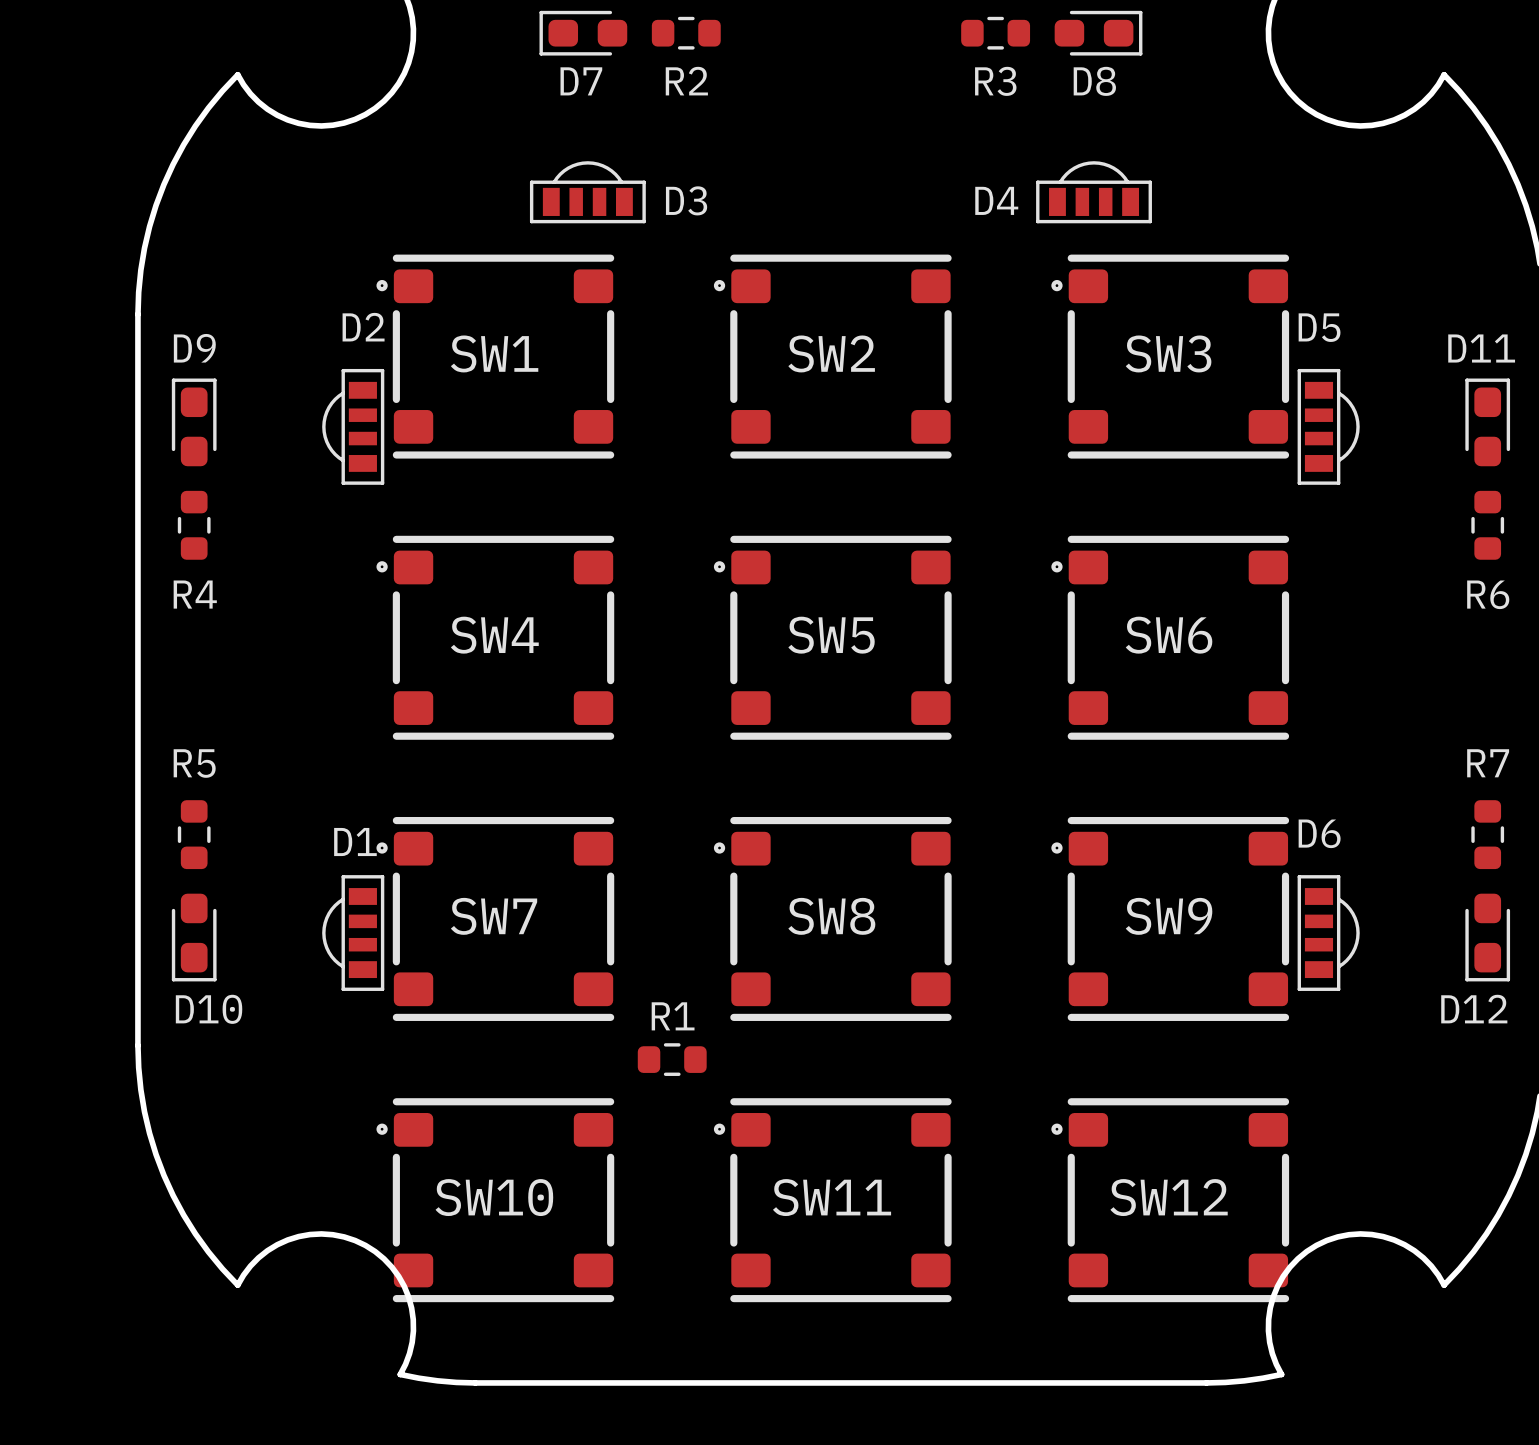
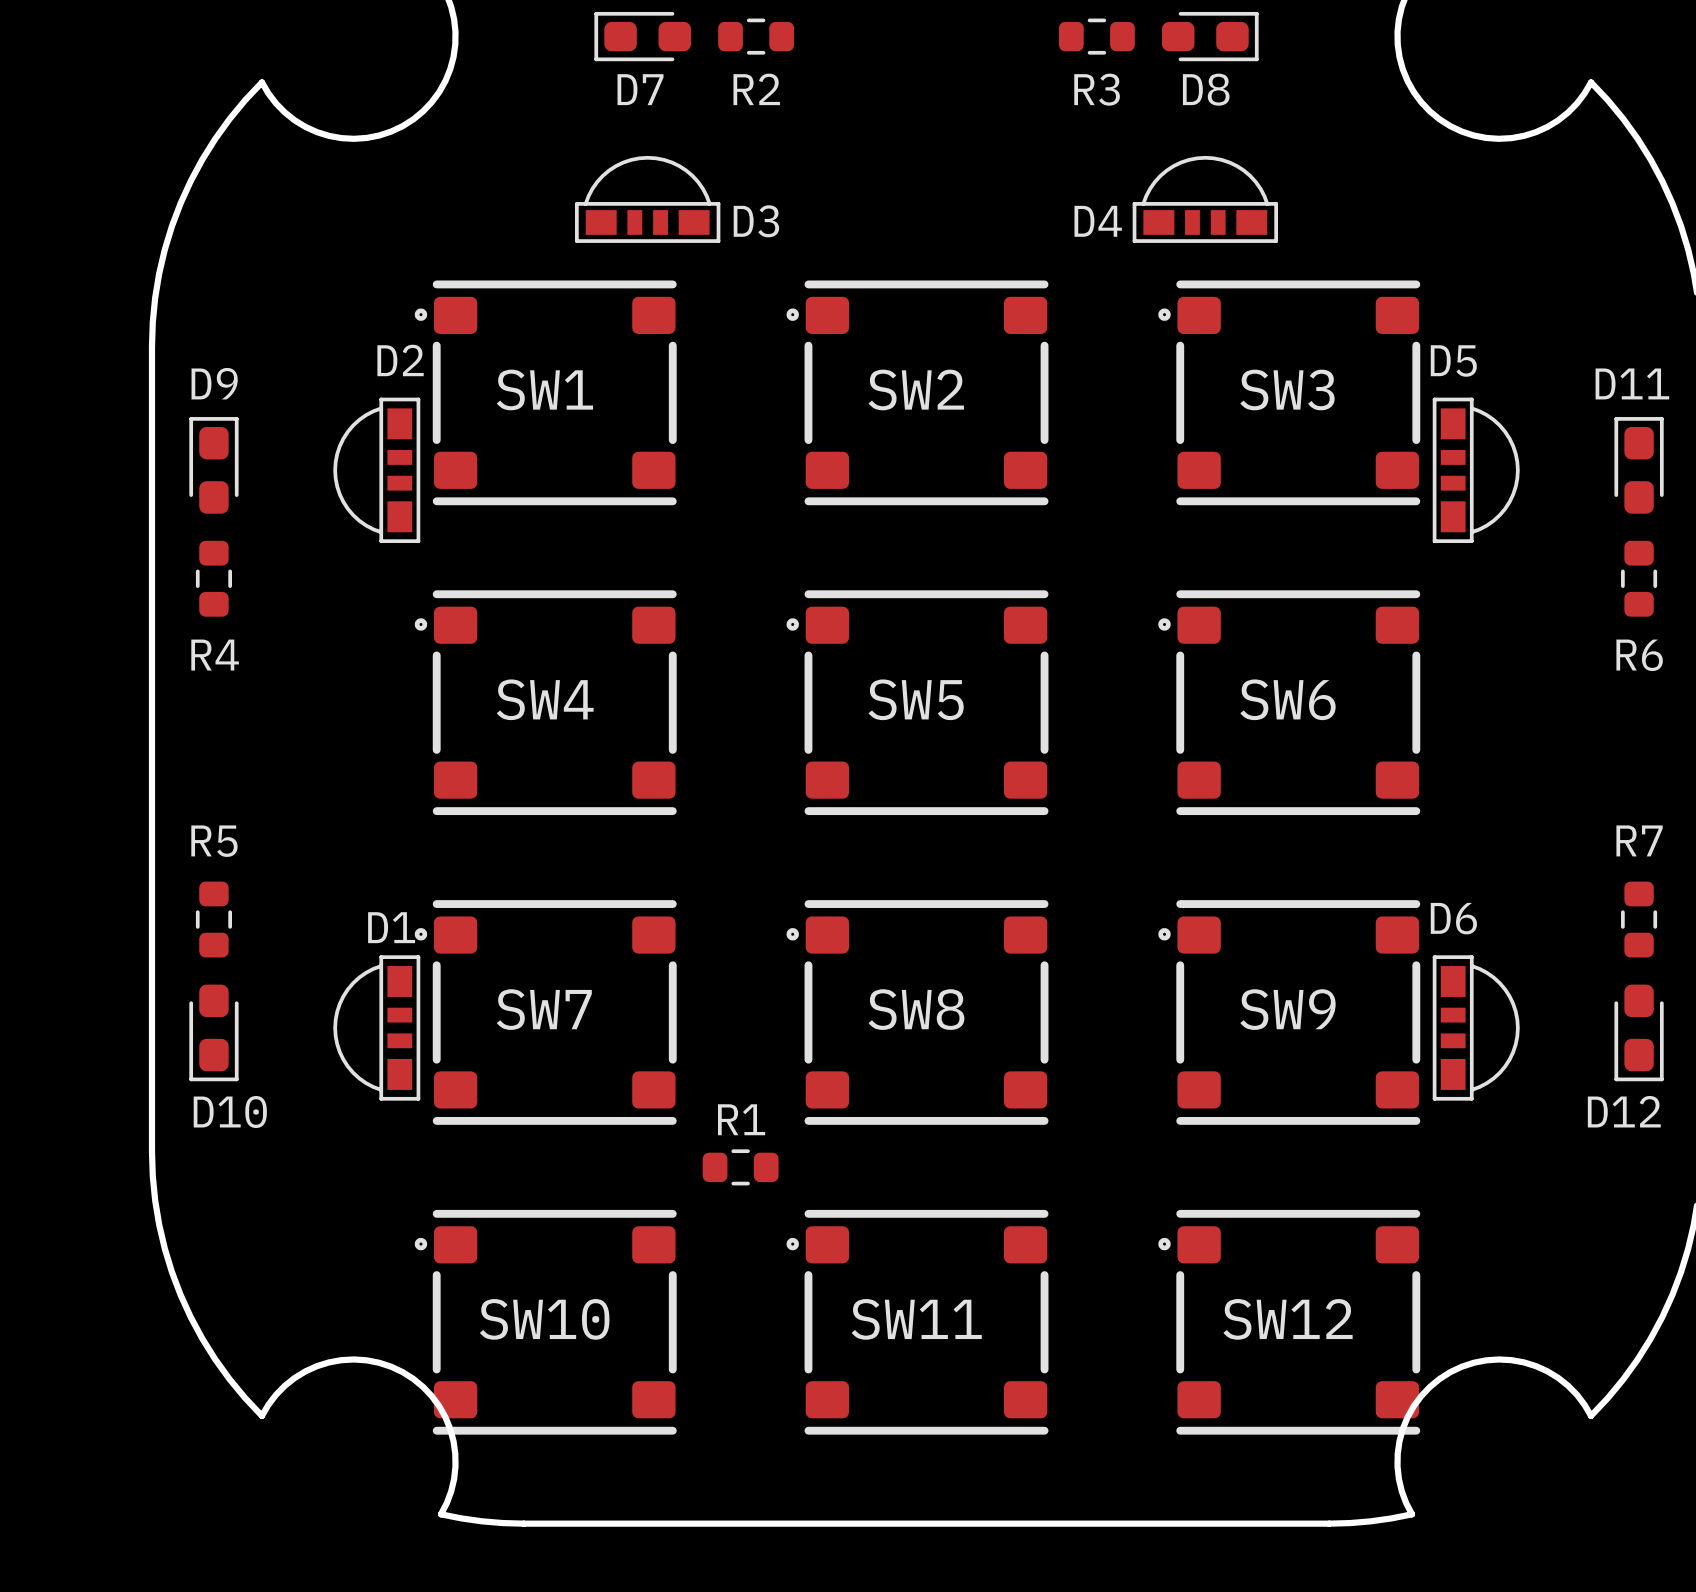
D3 footprint: [529, 161, 646, 224] -> [575, 155, 721, 243]
D4 footprint: [1036, 161, 1152, 224] -> [1132, 155, 1279, 243]
D2 footprint: [322, 368, 385, 485] -> [333, 397, 421, 543]
D5 footprint: [1297, 368, 1360, 485] -> [1432, 397, 1520, 543]
D1 footprint: [322, 875, 385, 991] -> [333, 955, 421, 1101]
D6 footprint: [1297, 875, 1360, 991] -> [1432, 955, 1520, 1101]

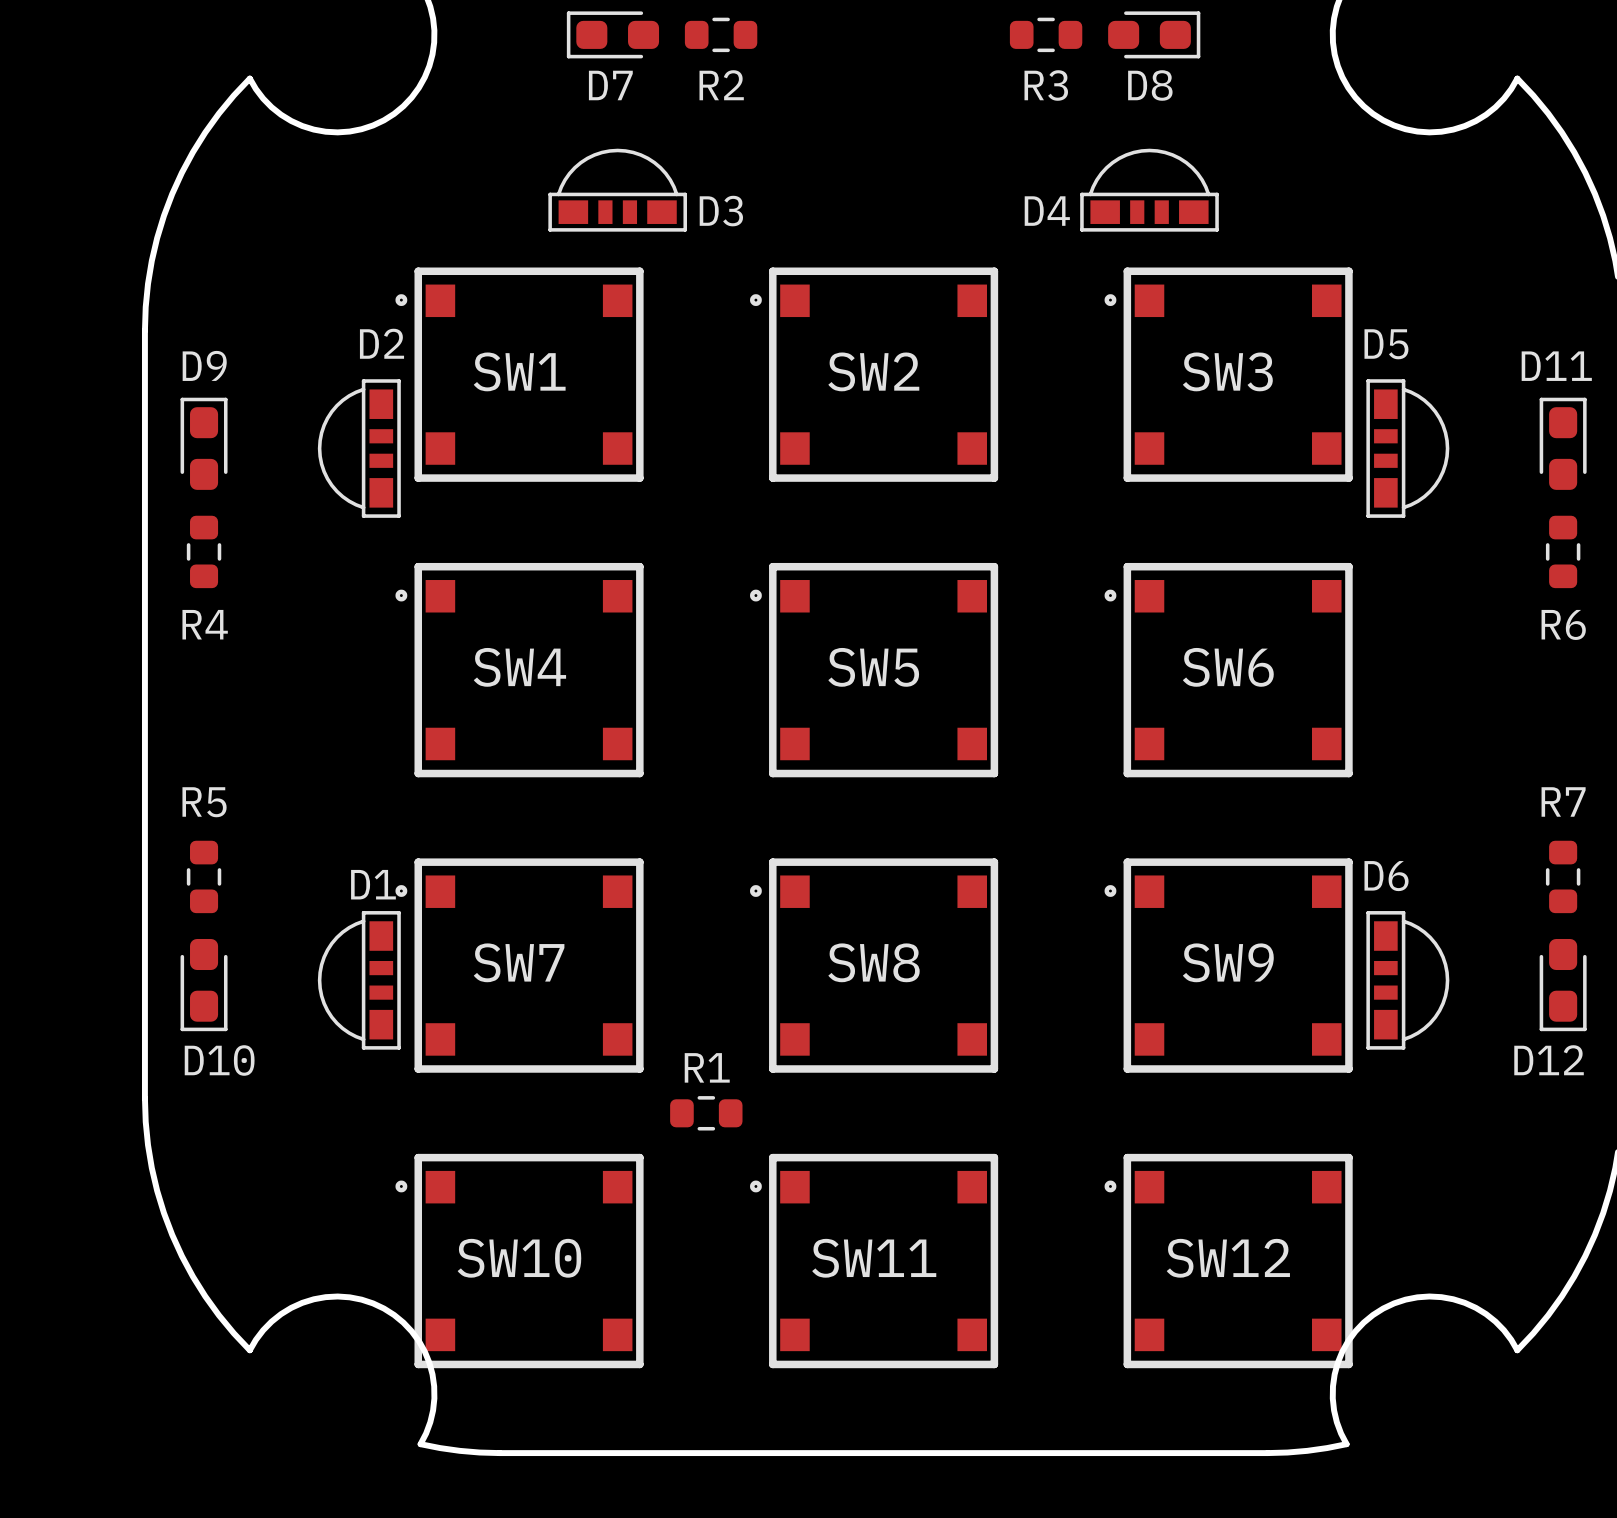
SW1 footprint: [414, 280, 677, 506] -> [395, 267, 644, 482]
SW2 footprint: [786, 280, 1049, 506] -> [750, 267, 999, 482]
SW3 footprint: [1158, 280, 1421, 506] -> [1104, 267, 1353, 482]
SW4 footprint: [414, 590, 677, 816] -> [395, 562, 644, 778]
SW5 footprint: [786, 590, 1049, 816] -> [750, 562, 999, 778]
SW6 footprint: [1158, 590, 1421, 816] -> [1104, 562, 1353, 778]
SW7 footprint: [414, 900, 677, 1125] -> [395, 858, 644, 1073]
SW8 footprint: [786, 900, 1049, 1125] -> [750, 858, 999, 1073]
SW9 footprint: [1158, 900, 1421, 1125] -> [1104, 858, 1353, 1073]
SW10 footprint: [414, 1209, 677, 1435] -> [395, 1153, 644, 1369]
SW11 footprint: [786, 1209, 1049, 1435] -> [750, 1153, 999, 1369]
SW12 footprint: [1158, 1209, 1421, 1435] -> [1104, 1153, 1353, 1369]

